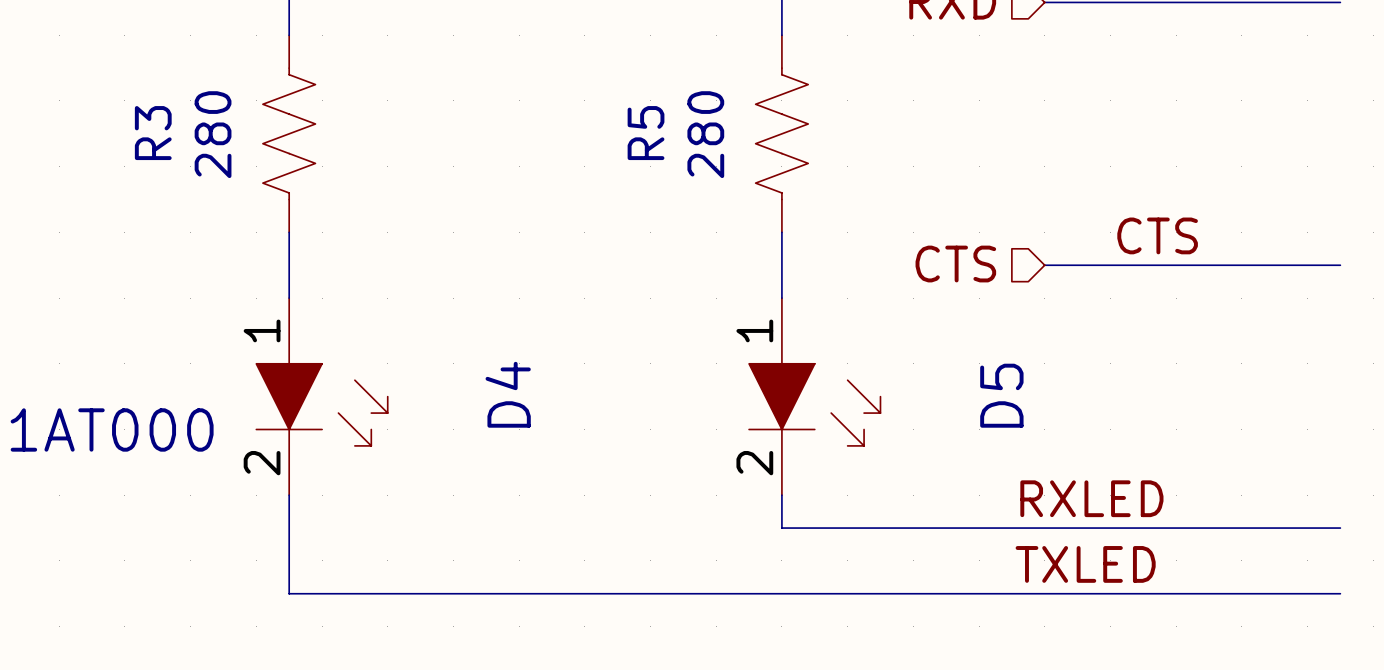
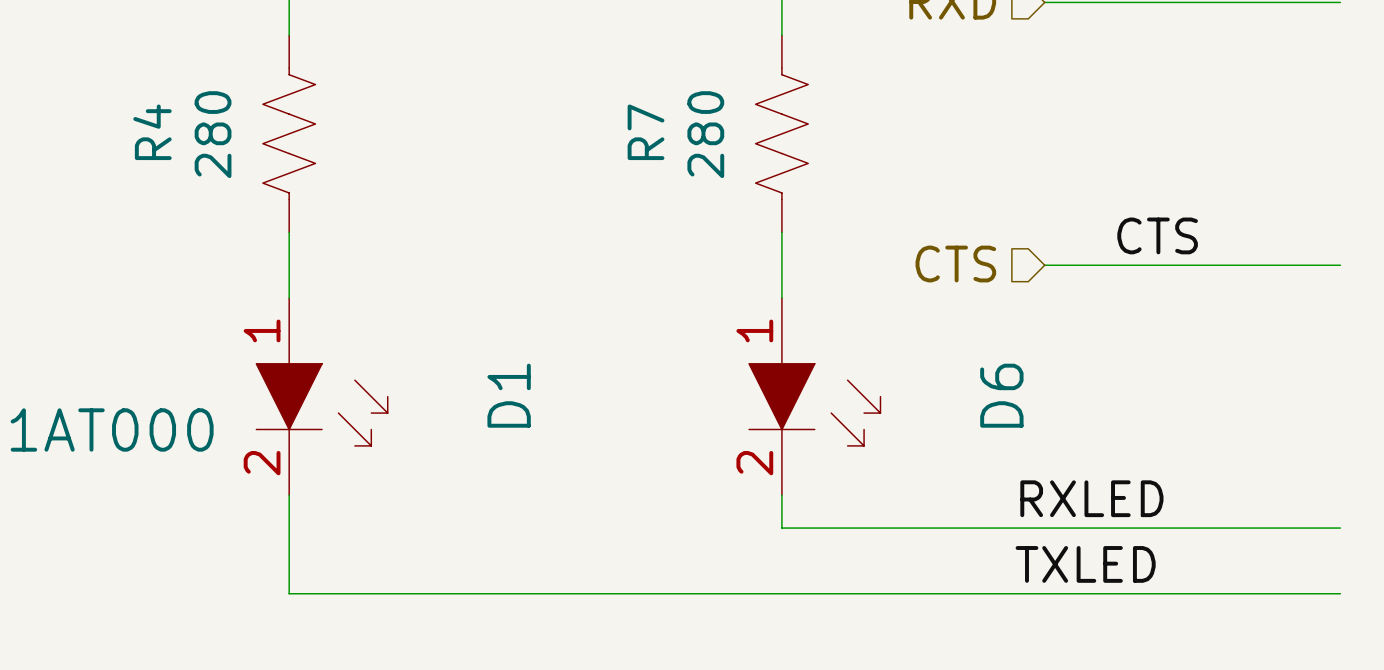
R3 name: R3 (153, 133) -> R4 (152, 132)
R5 name: R5 (646, 133) -> R7 (646, 132)
D4 name: D4 (508, 394) -> D1 (509, 395)
D5 name: D5 (1001, 395) -> D6 (1001, 395)

